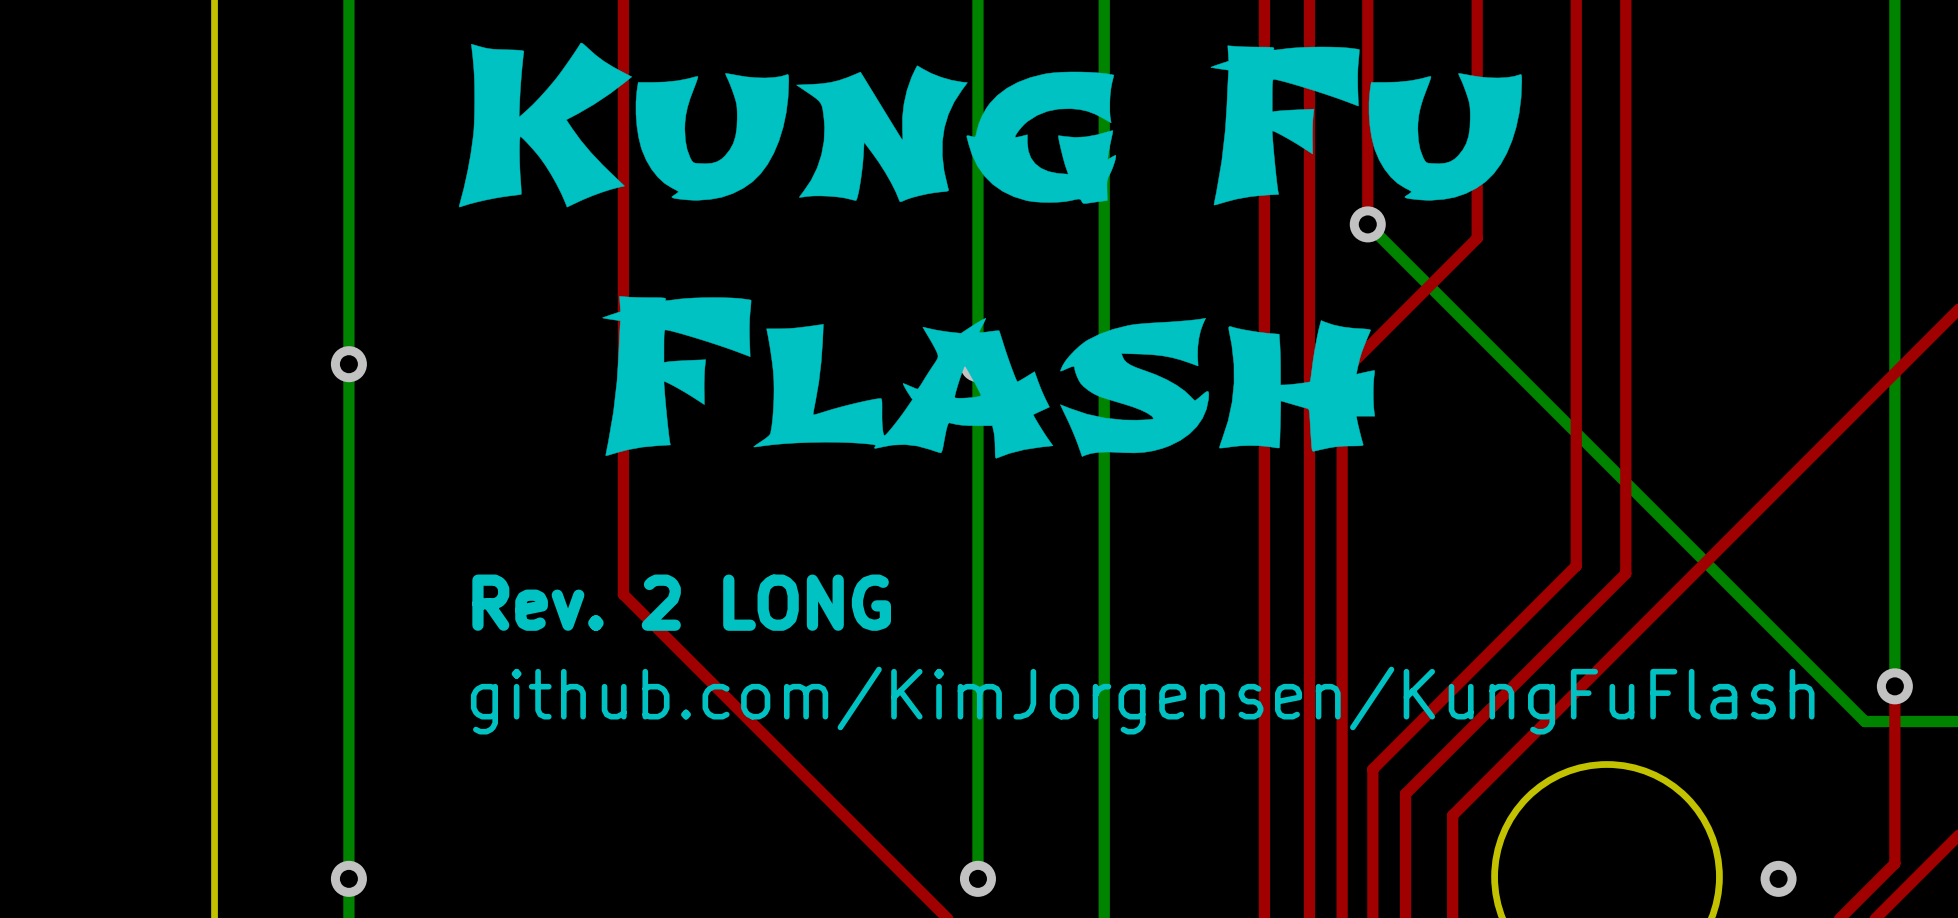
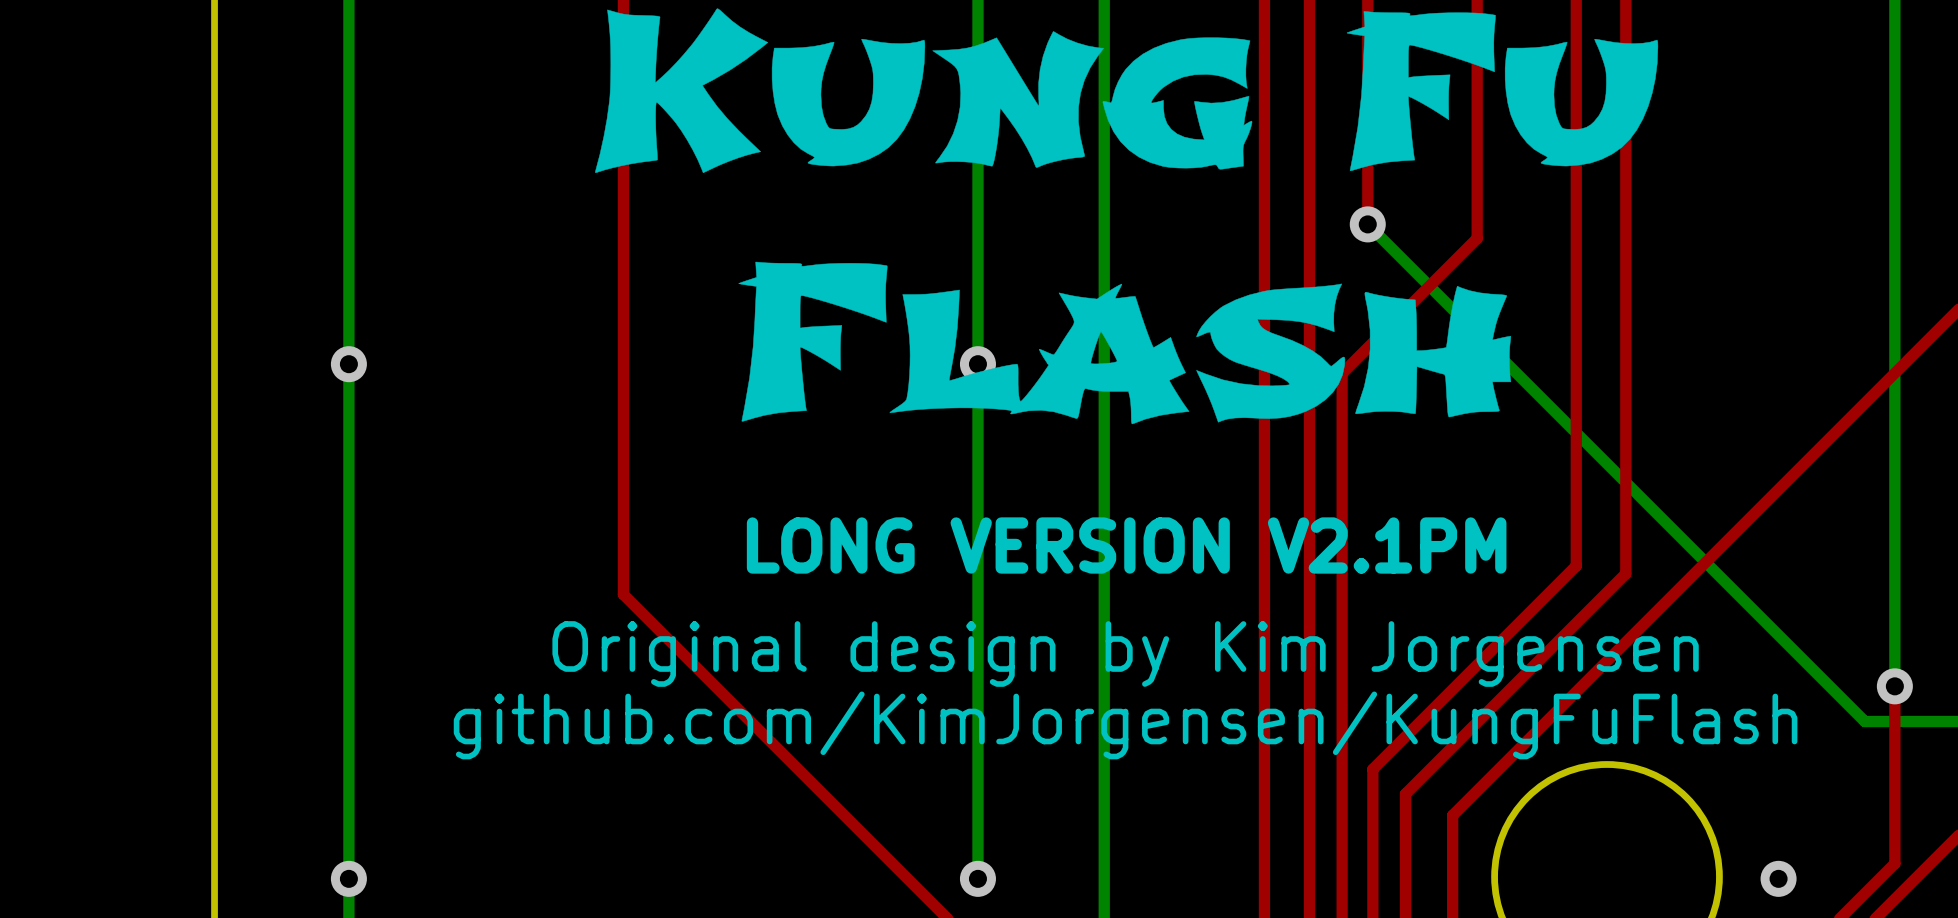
drawing position: (990, 250) -> (1126, 216)
text: none -> LONG VERSION V2.1PM (1126, 545)
text: Rev. 2 LONG (681, 602) -> none
text: none -> Original design by Kim Jorgensen (1125, 654)
text position: github.com/KimJorgensen/KungFuFlash (1142, 700) -> github.com/KimJorgensen/KungFuFlash (1125, 725)

